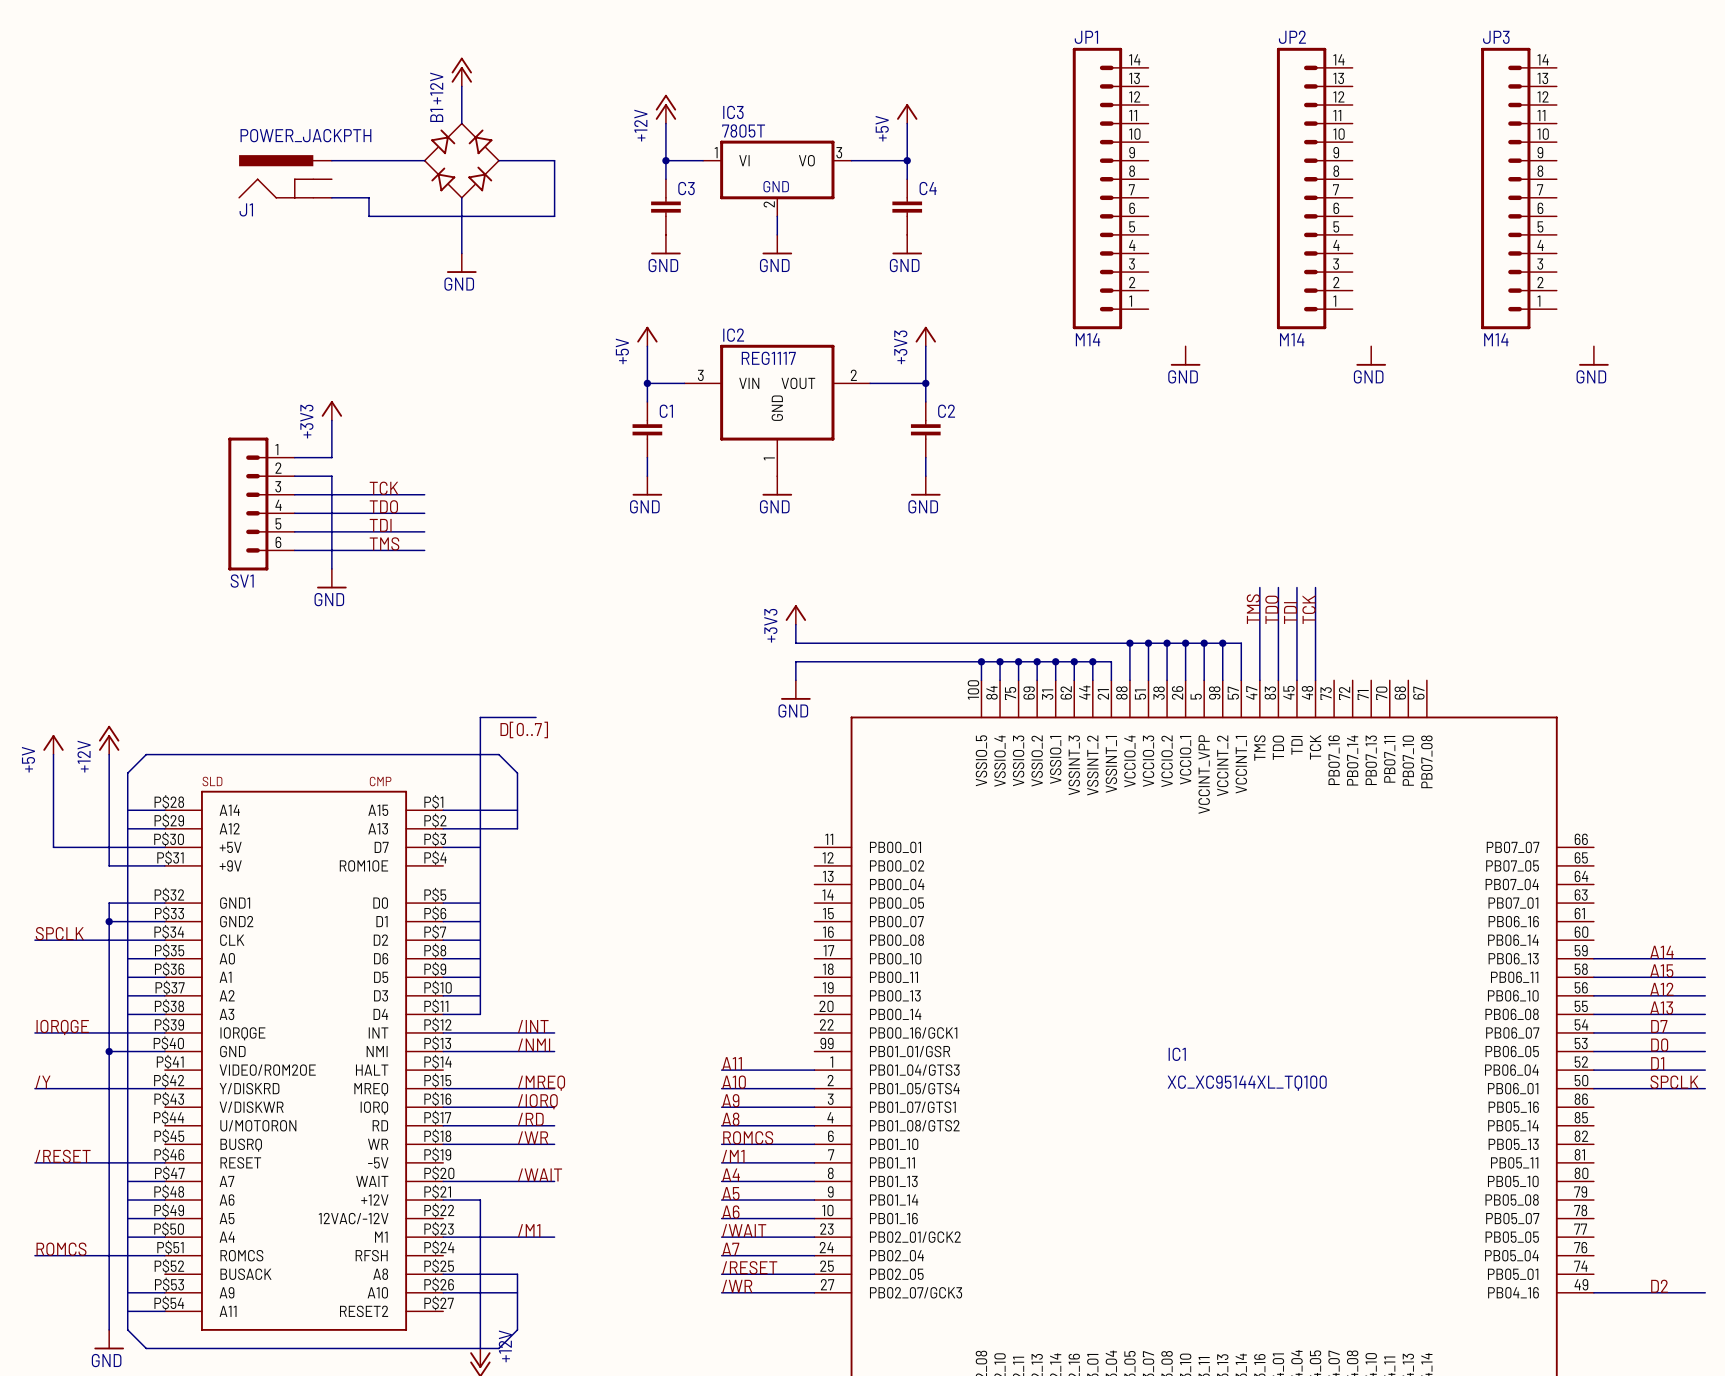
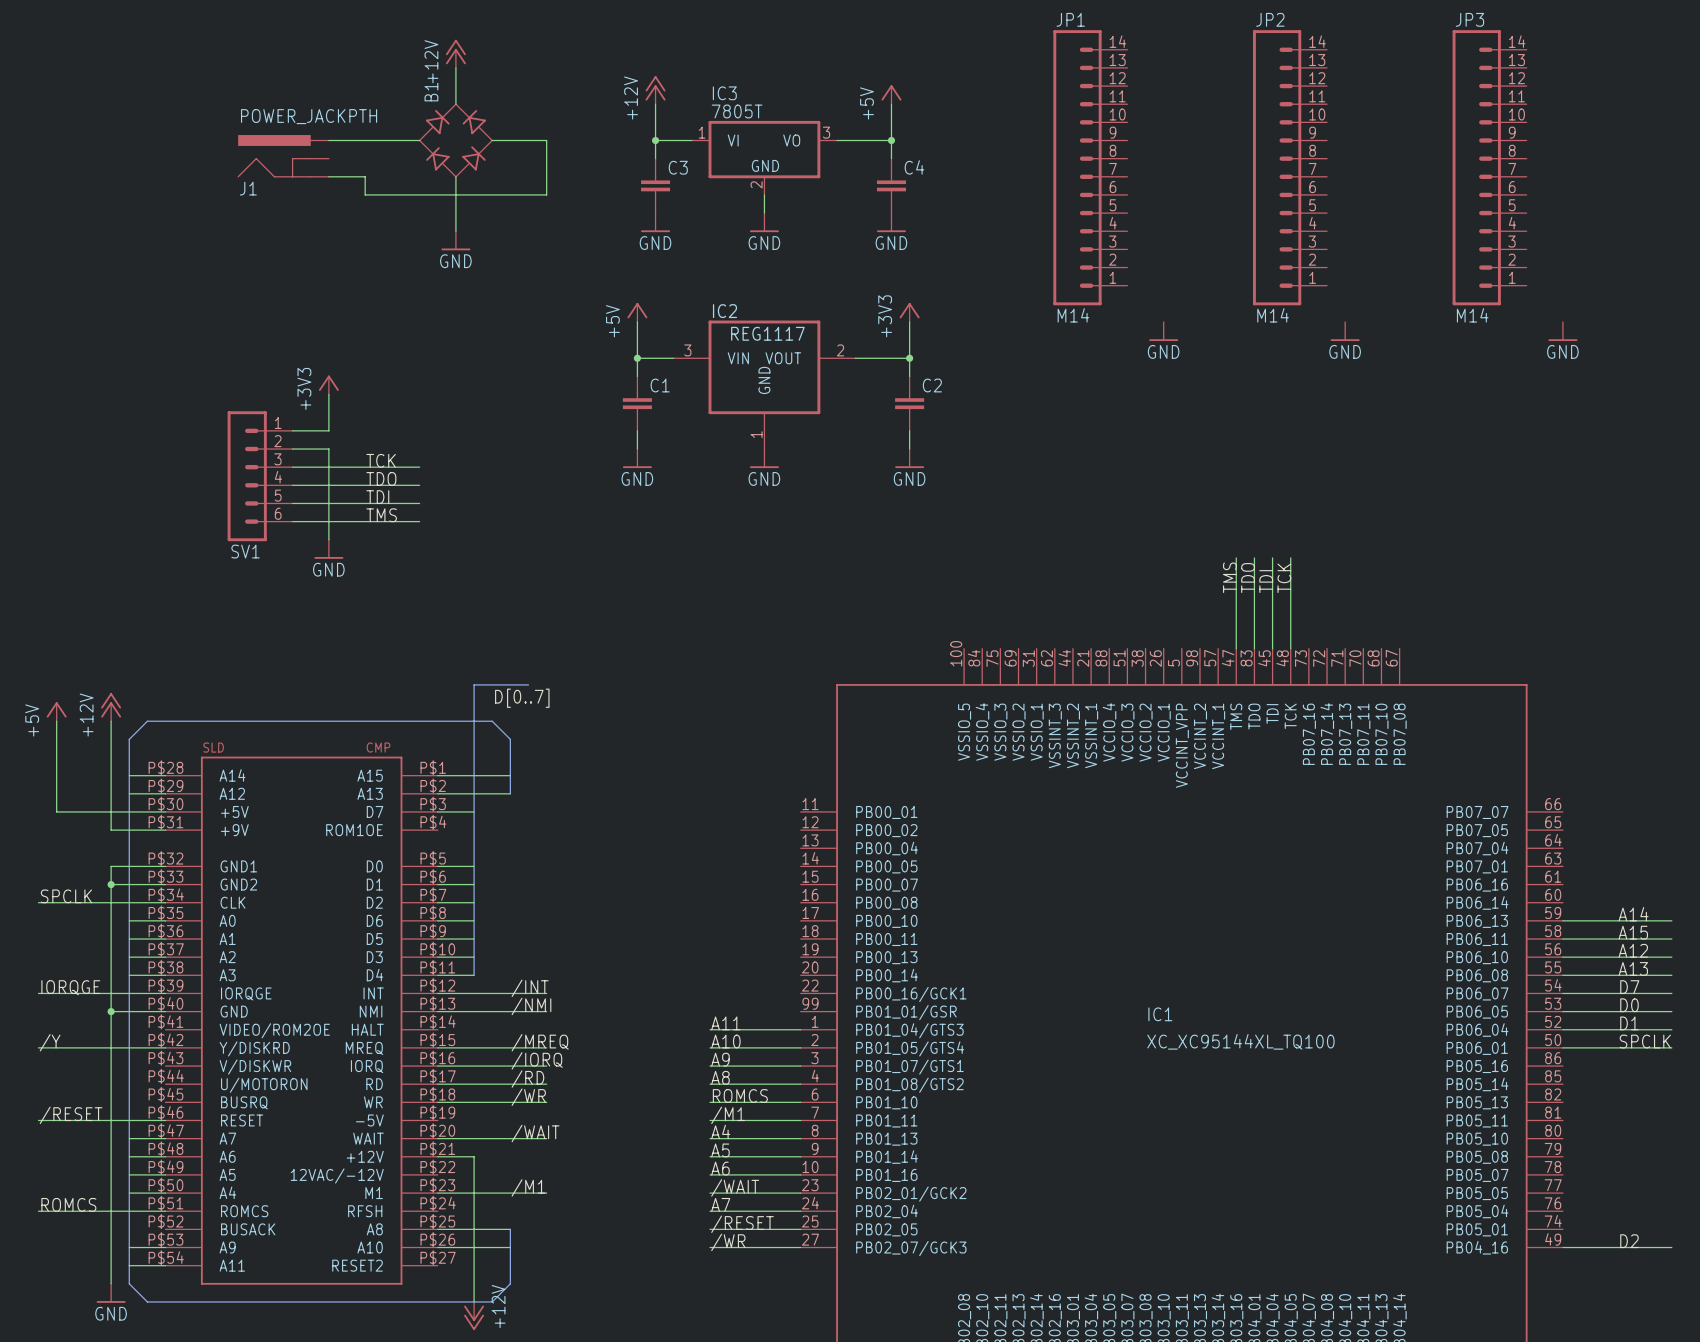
power symbol: +3V3 (795, 614) -> none
wire: (795, 624) (795, 643) (1241, 643) (1241, 680) -> none
wire: (1129, 643) (1129, 680) -> none
junction: (1129, 643) -> none
wire: (1148, 643) (1148, 680) -> none
junction: (1148, 643) -> none
wire: (1167, 643) (1167, 680) -> none
junction: (1167, 643) -> none
wire: (1185, 643) (1185, 680) -> none
junction: (1185, 643) -> none
wire: (1204, 643) (1204, 680) -> none
junction: (1204, 643) -> none
wire: (1222, 643) (1222, 680) -> none
junction: (1222, 643) -> none
wire: (981, 661) (981, 680) -> none
junction: (981, 661) -> none
wire: (1000, 661) (1000, 680) -> none
junction: (1000, 661) -> none
wire: (1018, 661) (1018, 680) -> none
junction: (1018, 661) -> none
wire: (1037, 661) (1037, 680) -> none
junction: (1037, 661) -> none
wire: (1055, 661) (1055, 680) -> none
junction: (1055, 661) -> none
wire: (1074, 661) (1074, 680) -> none
junction: (1074, 661) -> none
wire: (1092, 661) (1092, 680) -> none
junction: (1092, 661) -> none
wire: (795, 680) (795, 661) (1111, 661) (1111, 680) -> none
power symbol: GND (795, 690) -> none

